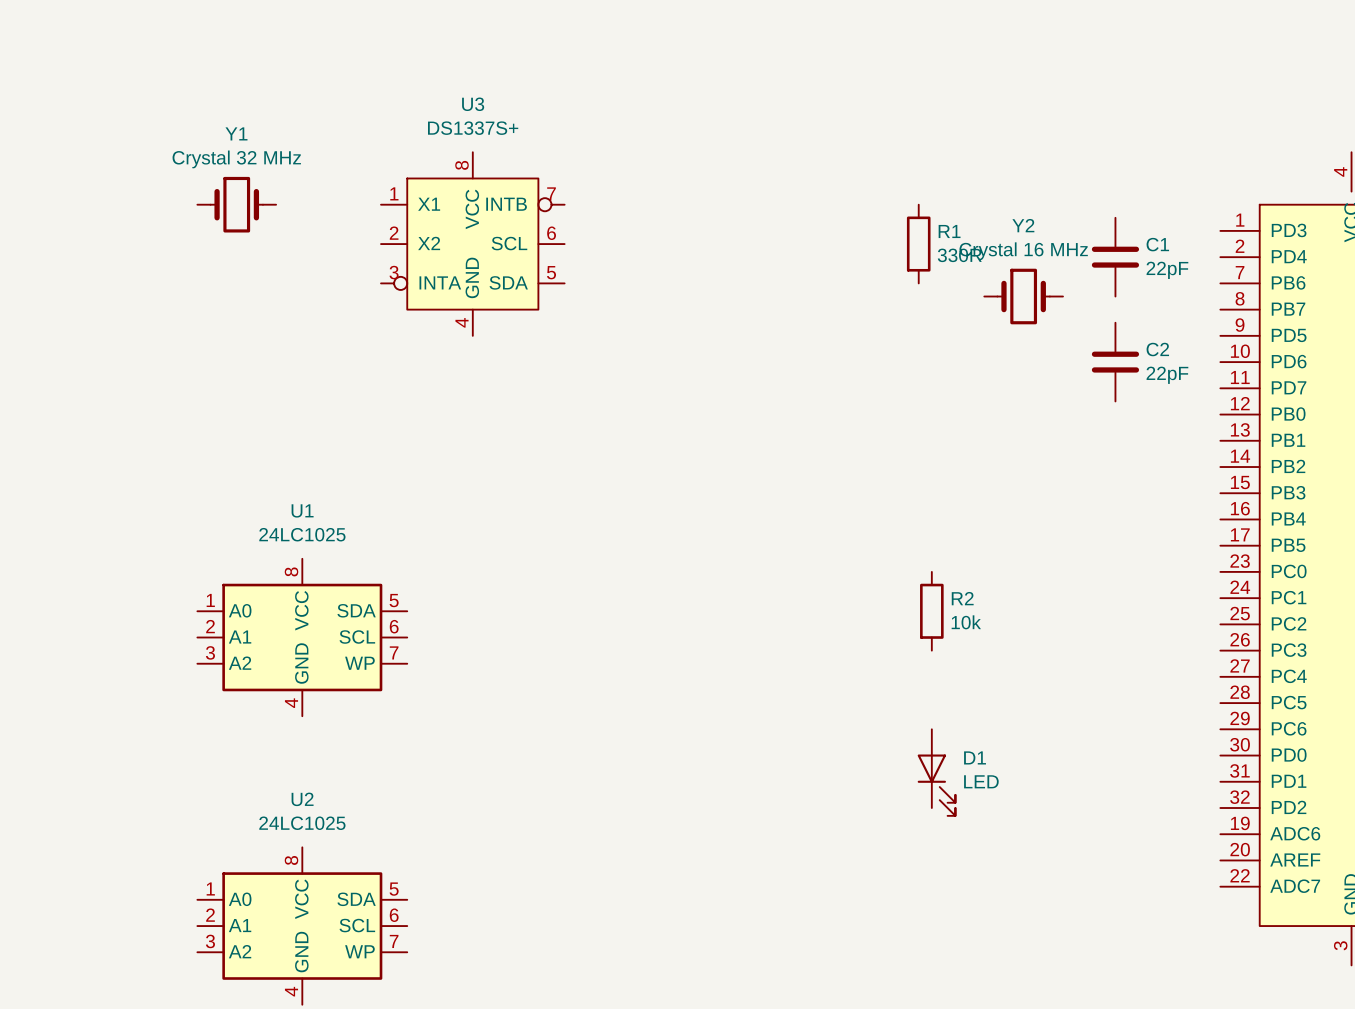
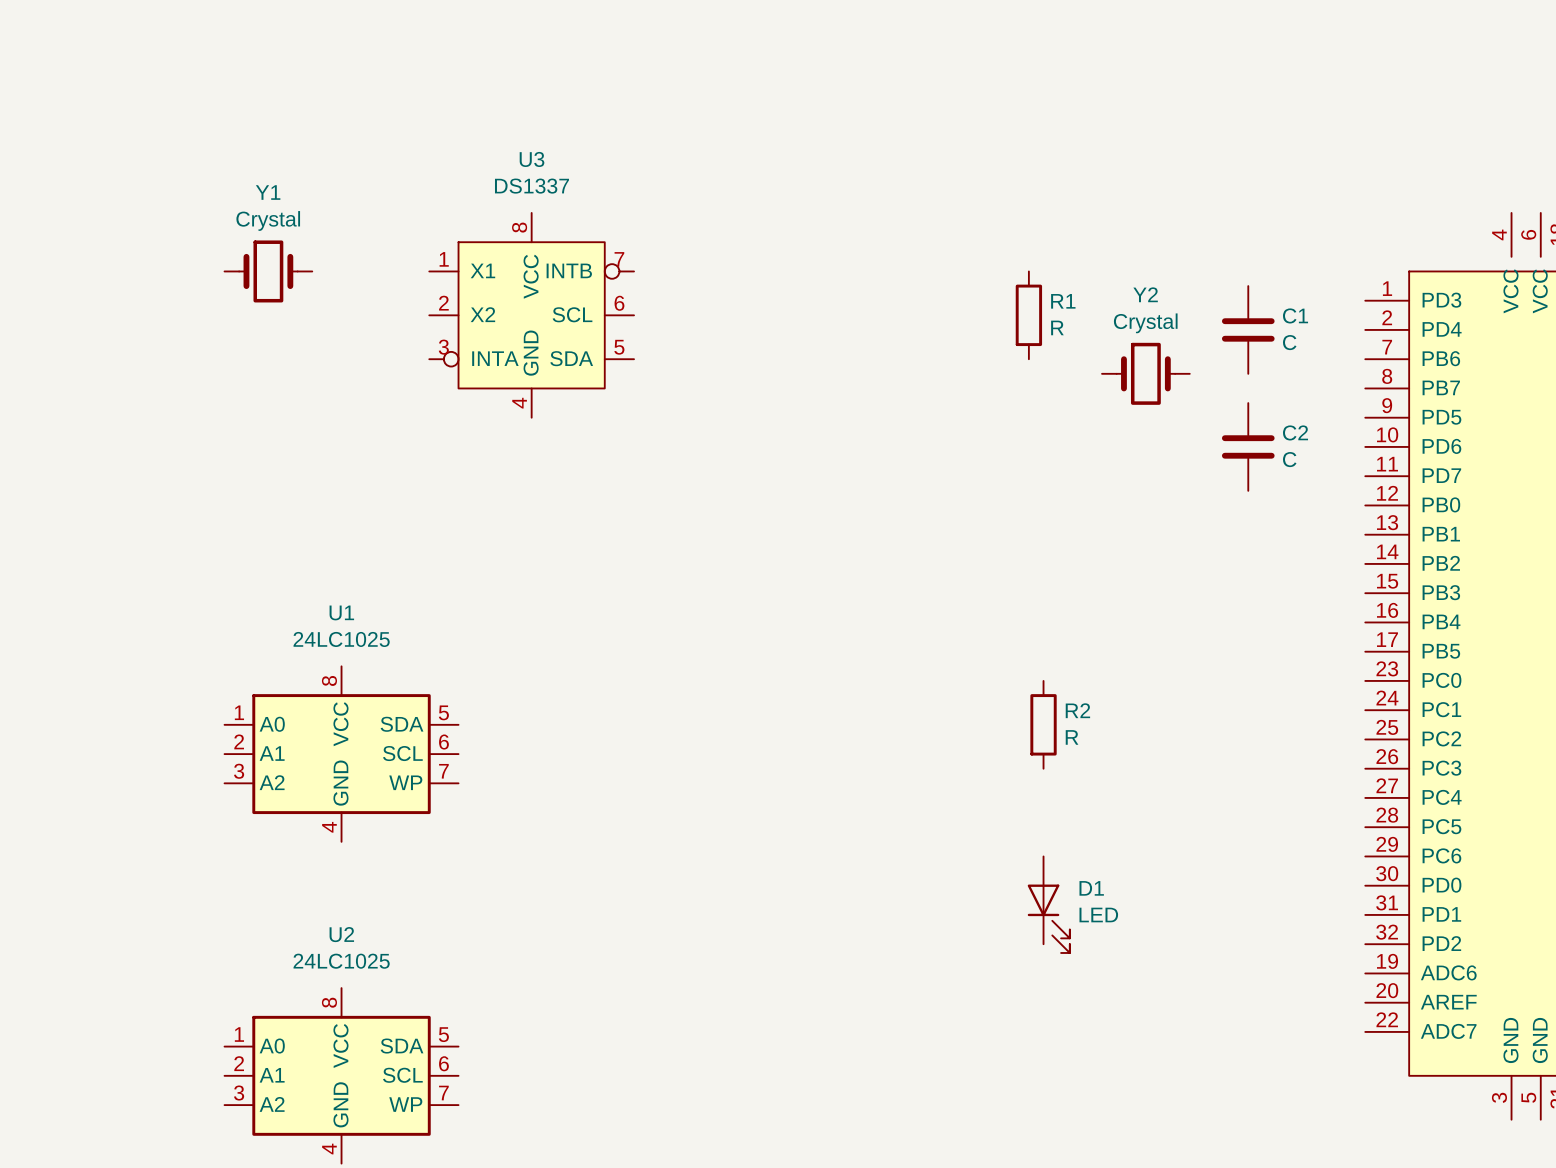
U3 value: DS1337S+ (473, 128) -> DS1337 (531, 186)
Y1 value: Crystal 32 MHz (236, 159) -> Crystal (268, 220)
Y2 value: Crystal 16 MHz (1023, 251) -> Crystal (1145, 323)
R1 value: 330R (959, 255) -> R (1057, 327)
C1 value: 22pF (1167, 270) -> C (1289, 342)
C2 value: 22pF (1167, 375) -> C (1289, 459)
R2 value: 10k (966, 622) -> R (1072, 737)

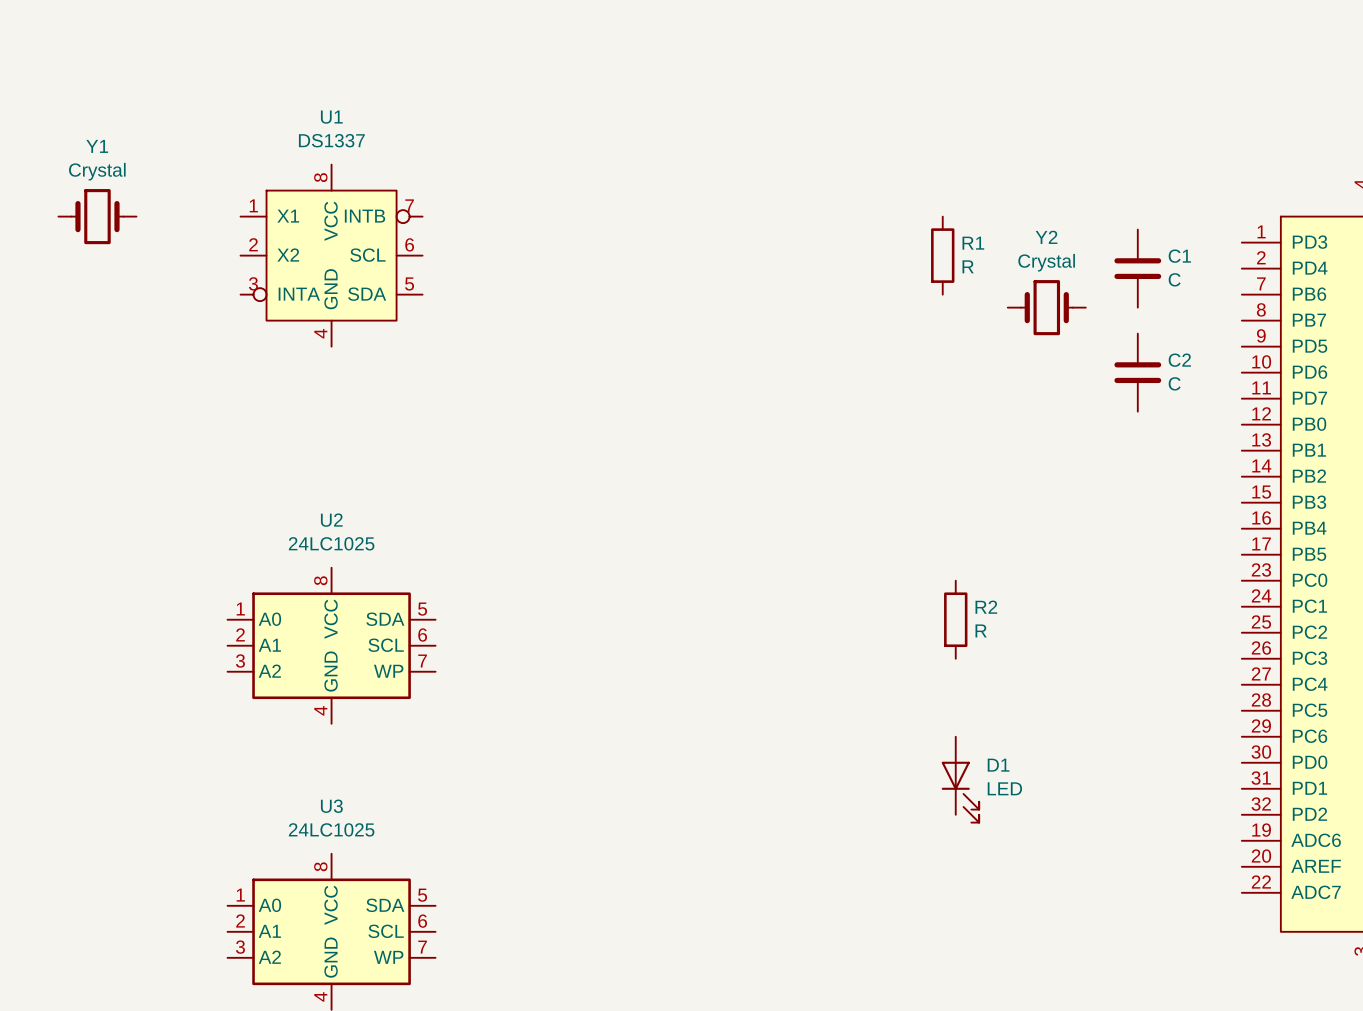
Y1 position: (268, 271) -> (97, 216)
U1: none -> DS1337 (331, 255)
U3: DS1337 (531, 315) -> none
U1 name: U1 (341, 612) -> U2 (331, 520)
U2 name: U2 (341, 934) -> U3 (331, 806)

